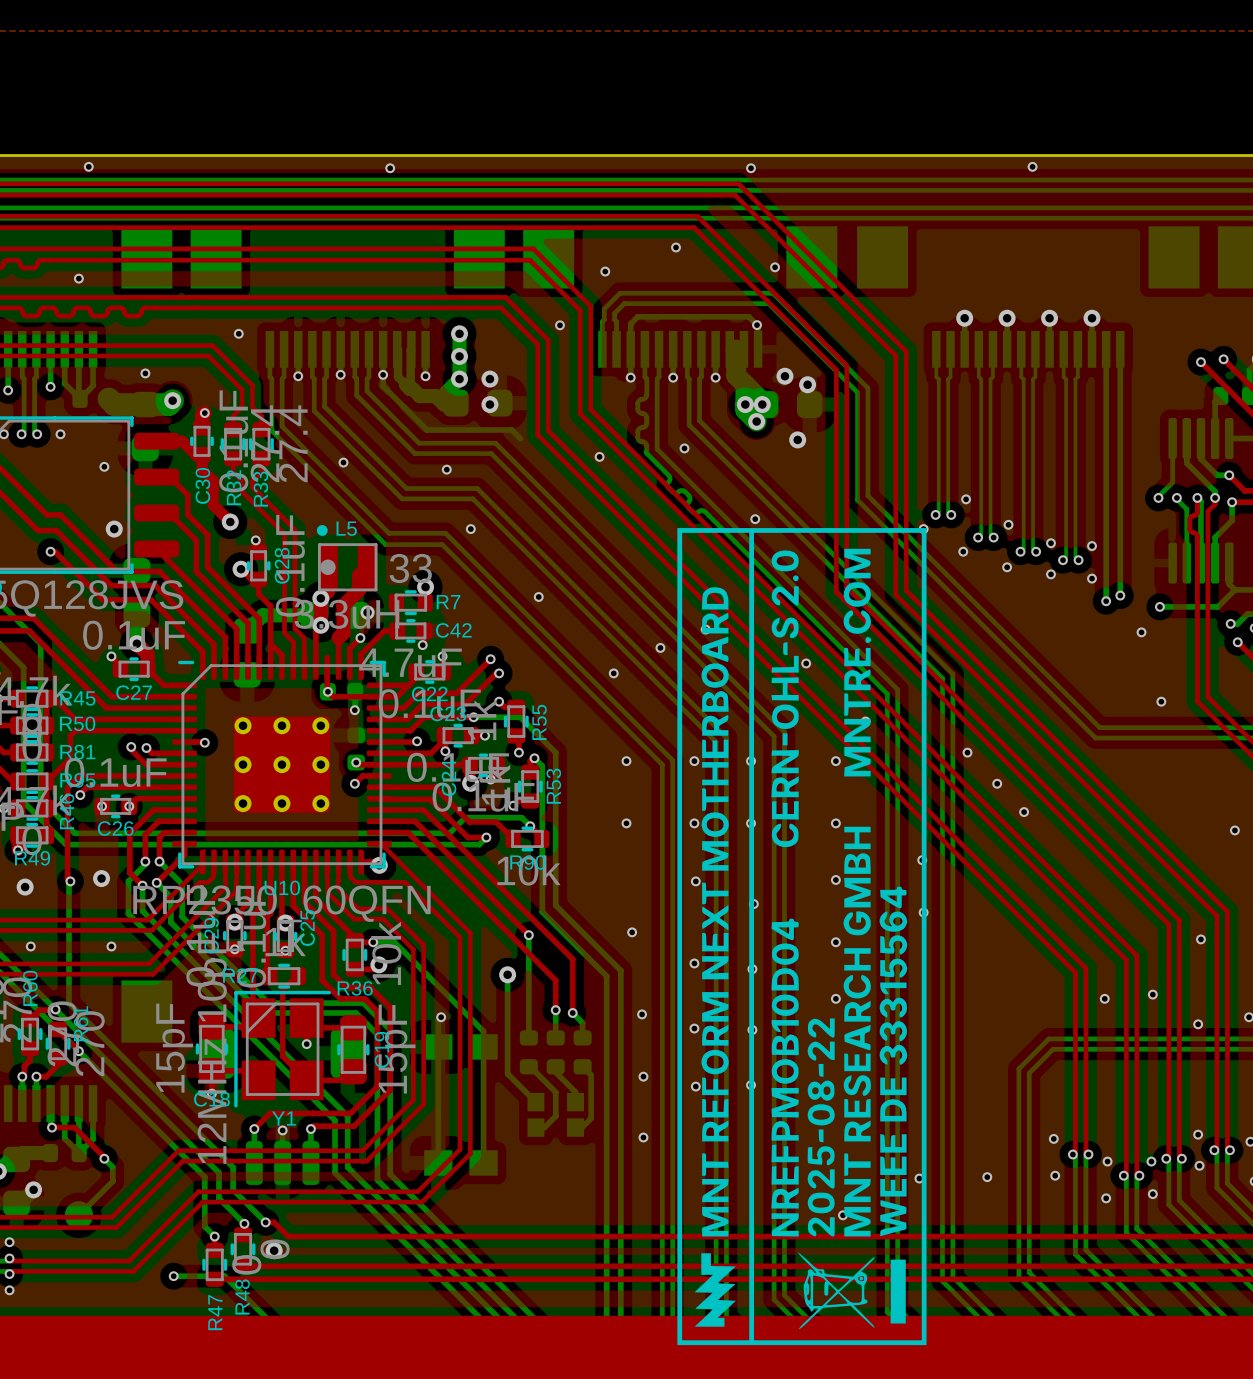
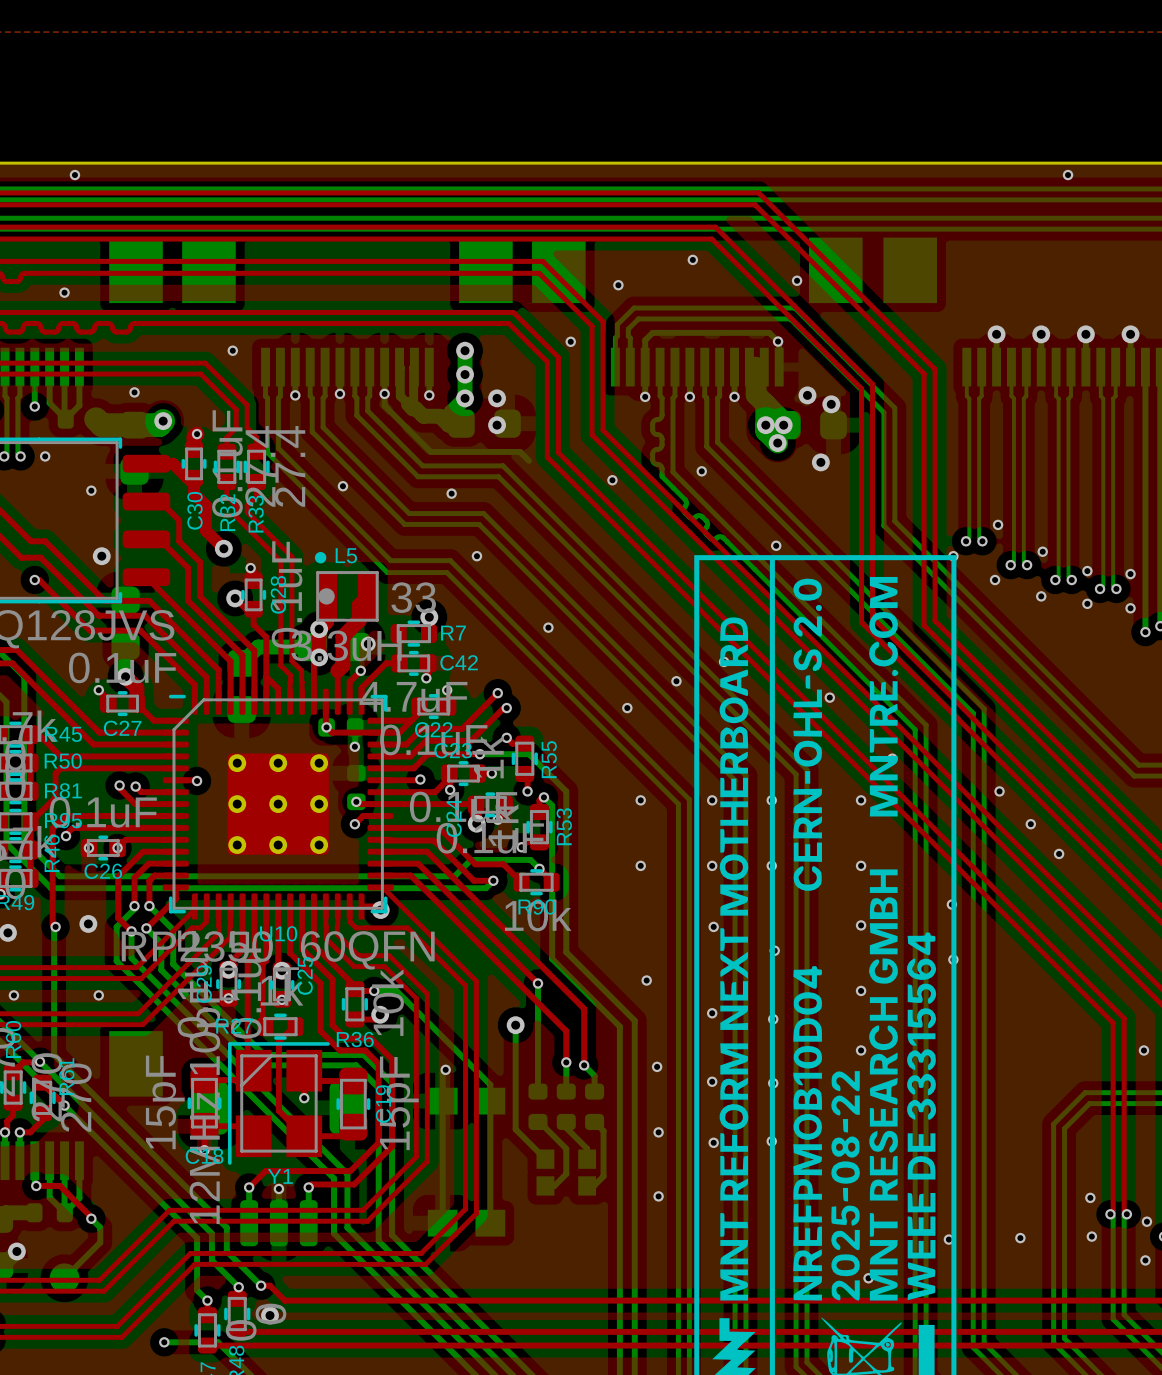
via: (390, 168) -> none
via: (751, 168) -> none

